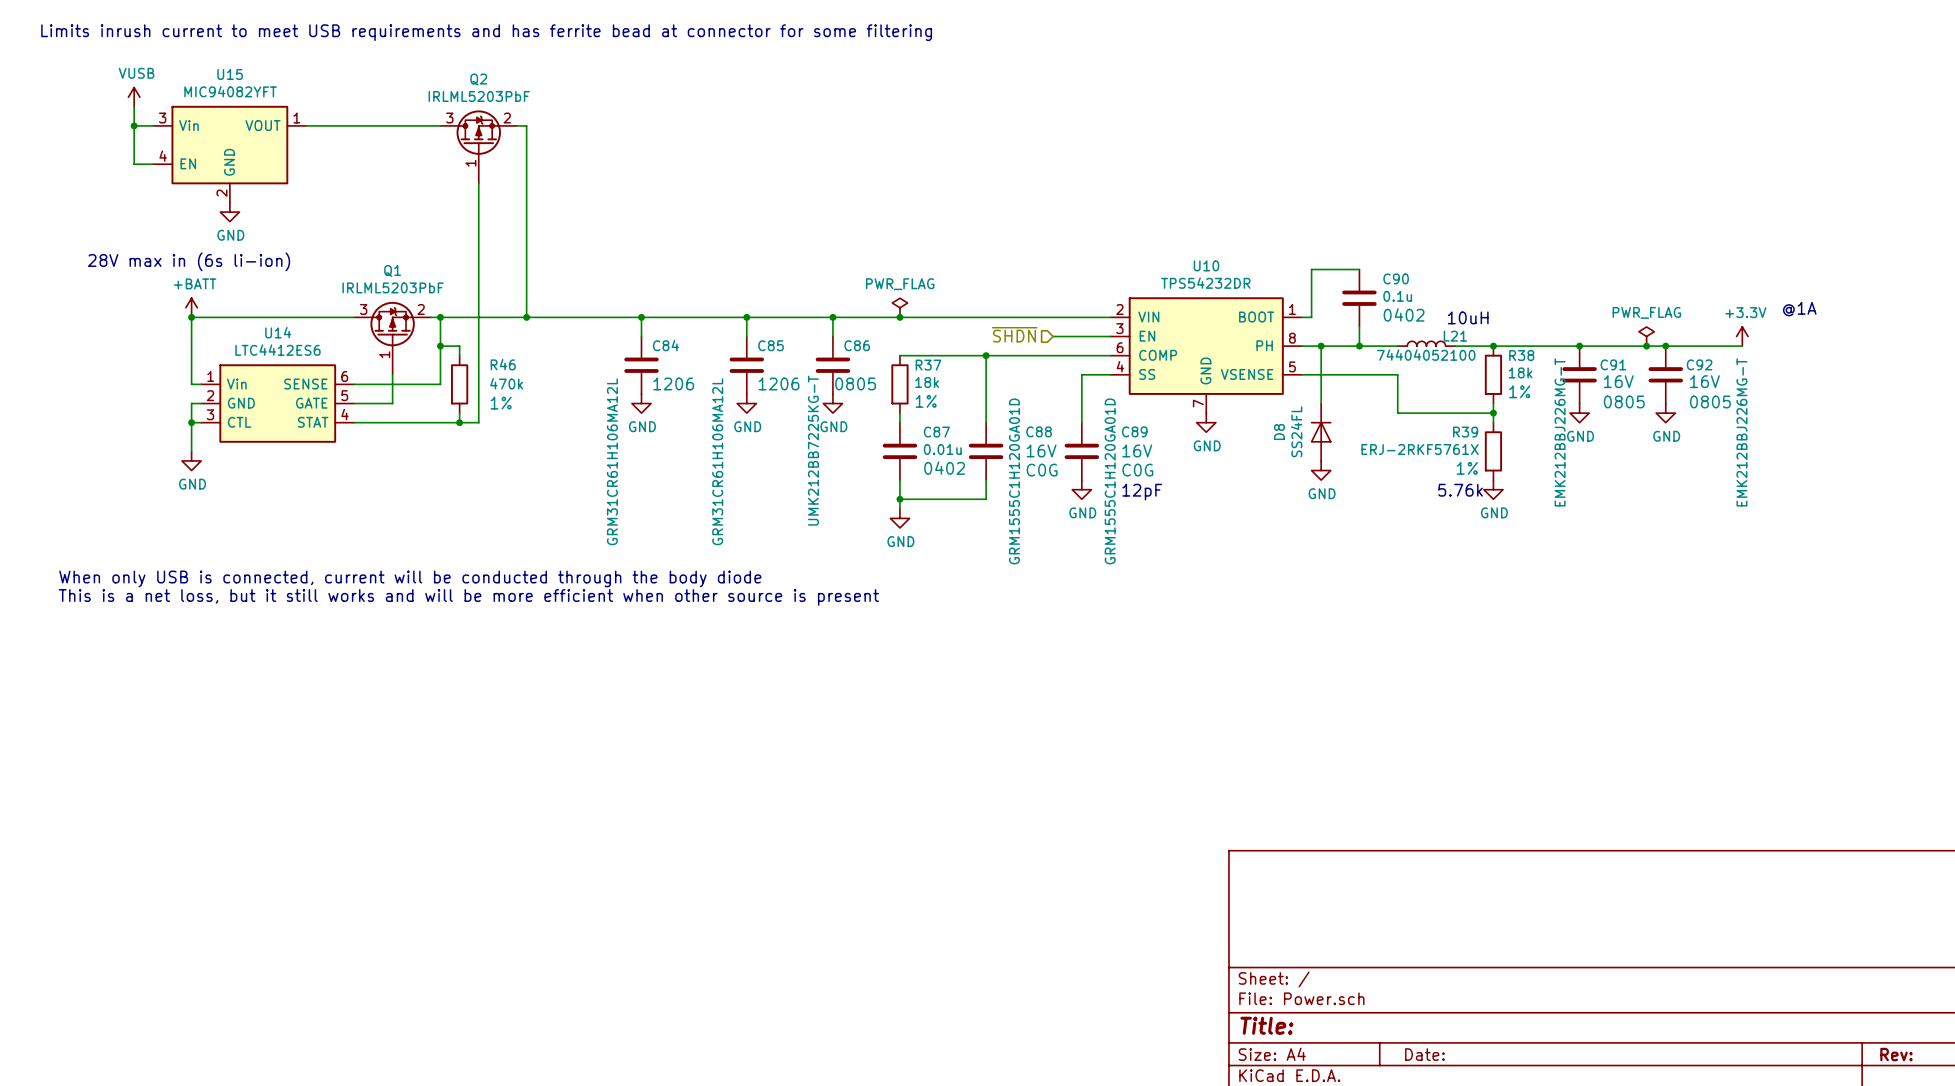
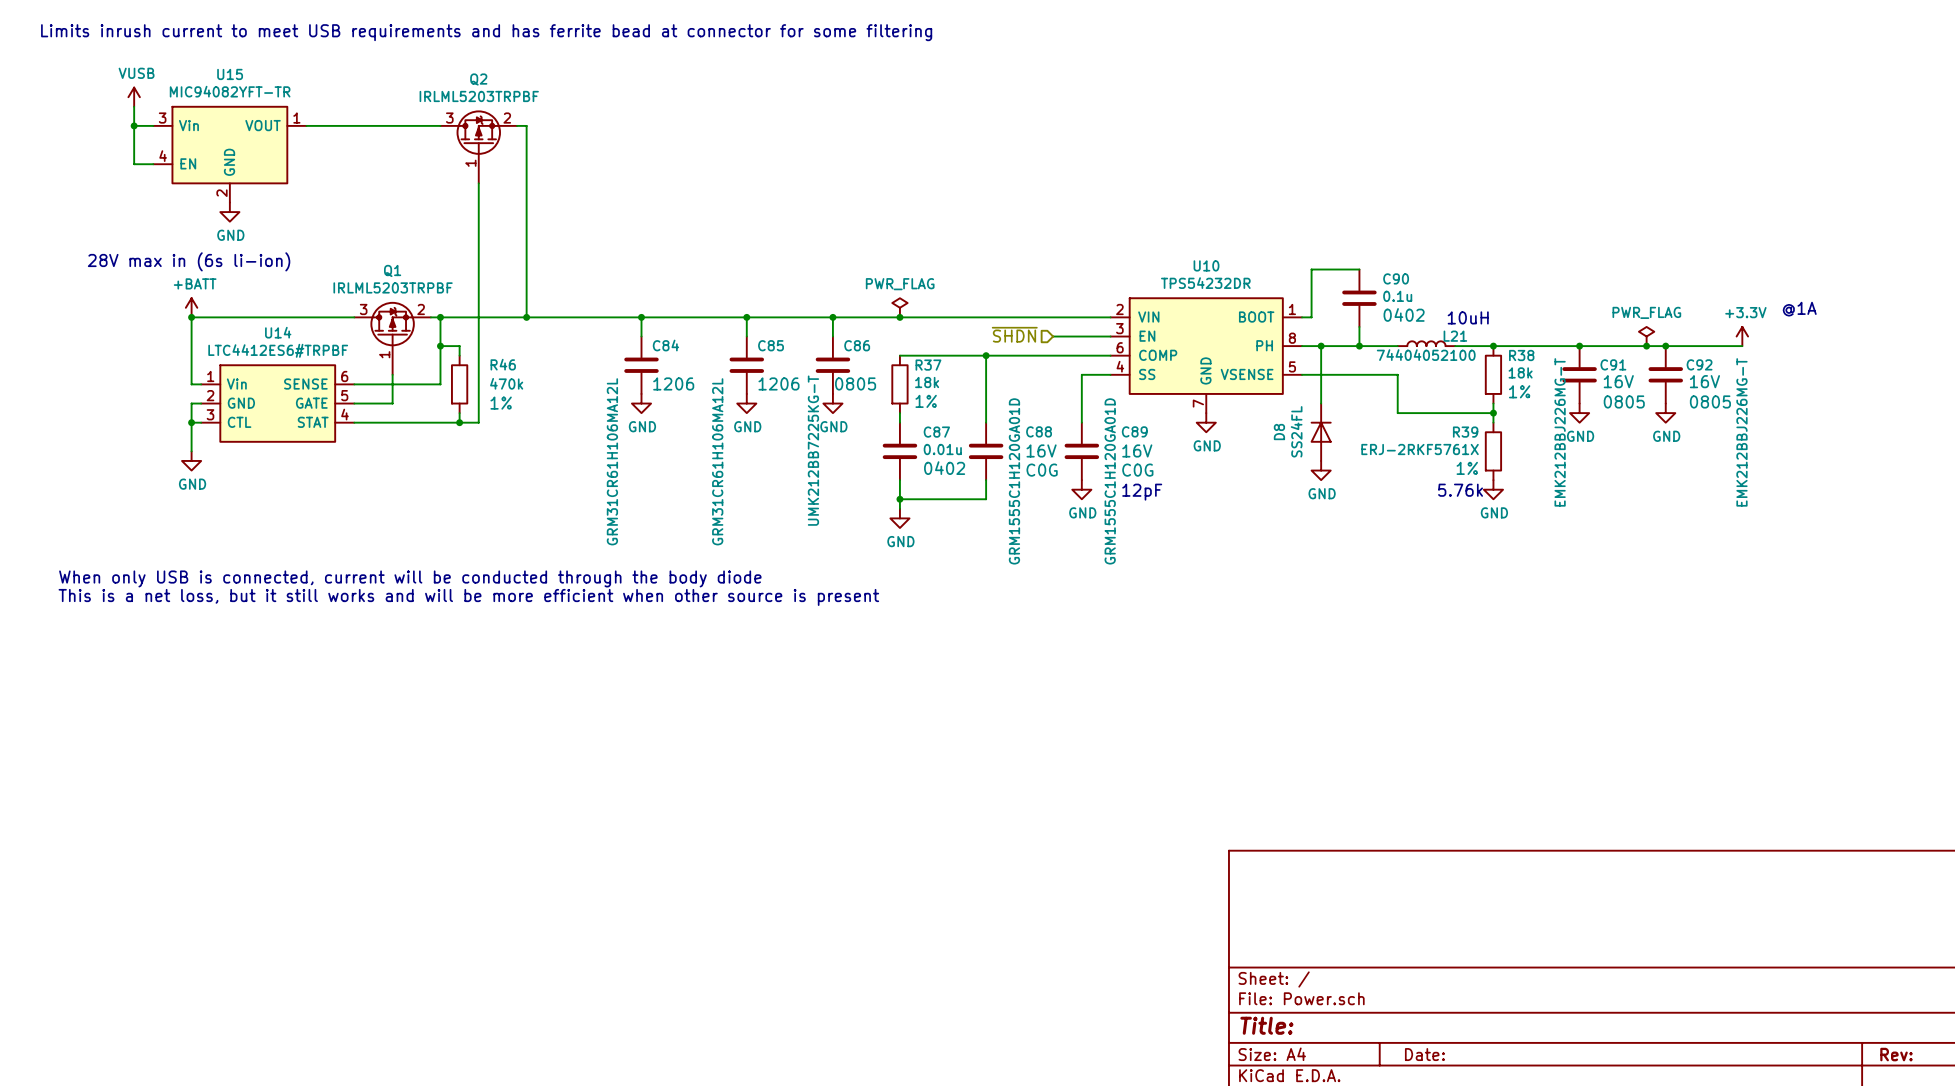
U15 value: MIC94082YFT (230, 91) -> MIC94082YFT-TR (230, 91)
Q2 value: IRLML5203PbF (479, 96) -> IRLML5203TRPBF (479, 96)
Q1 value: IRLML5203PbF (393, 287) -> IRLML5203TRPBF (393, 287)
U14 value: LTC4412ES6 (277, 350) -> LTC4412ES6#TRPBF (278, 350)

